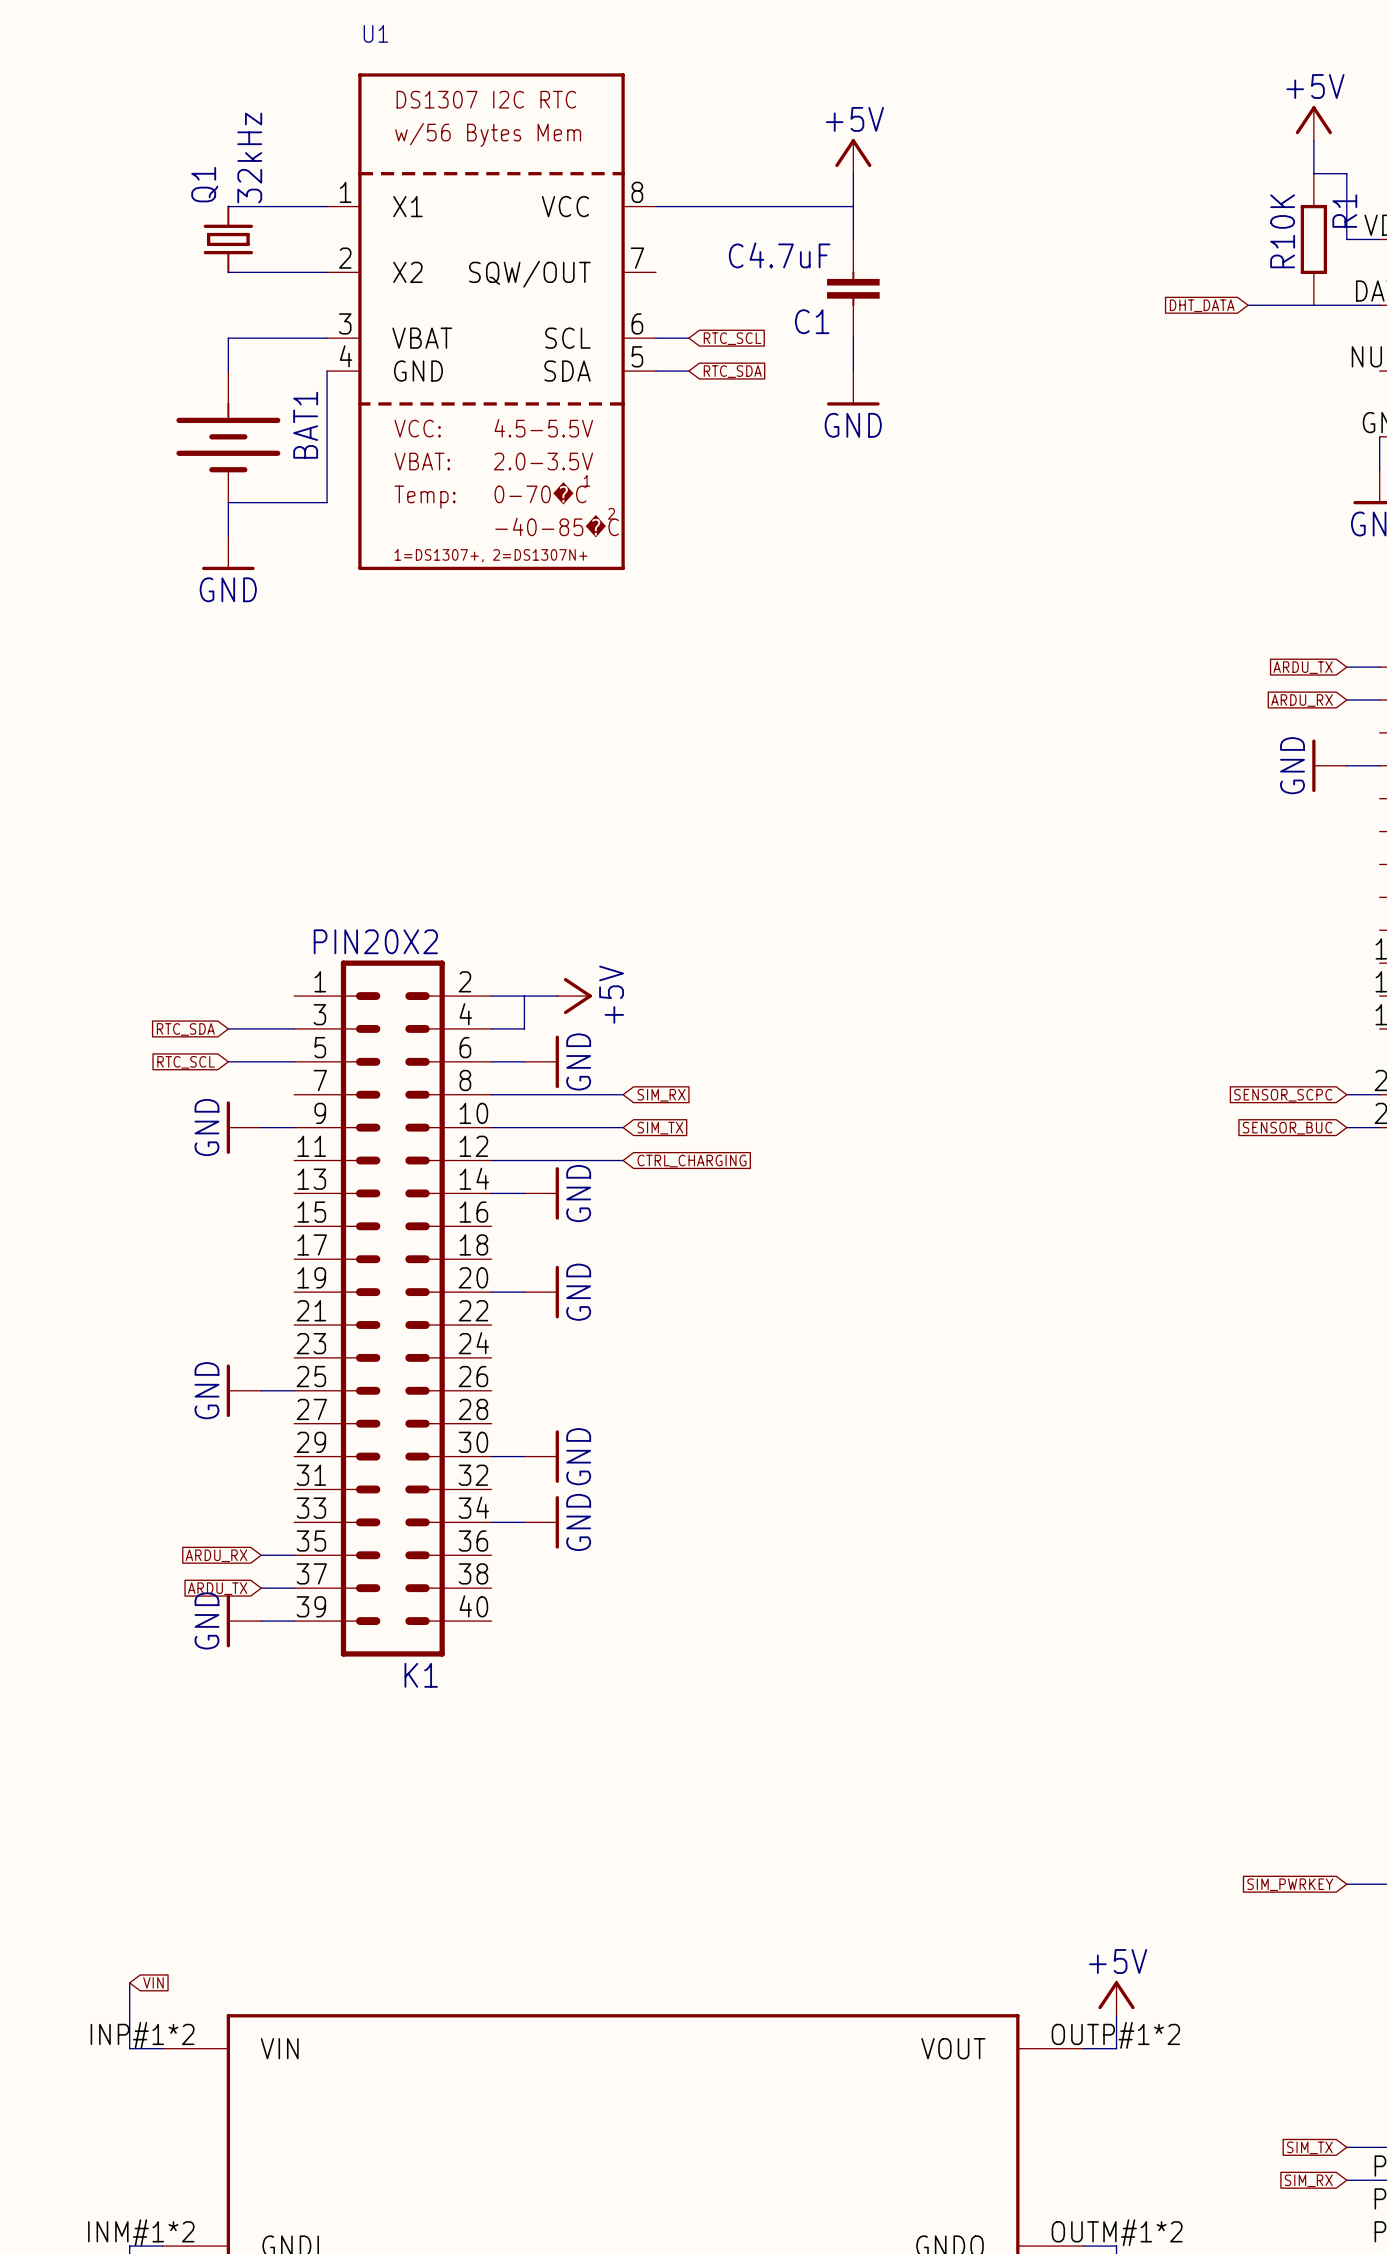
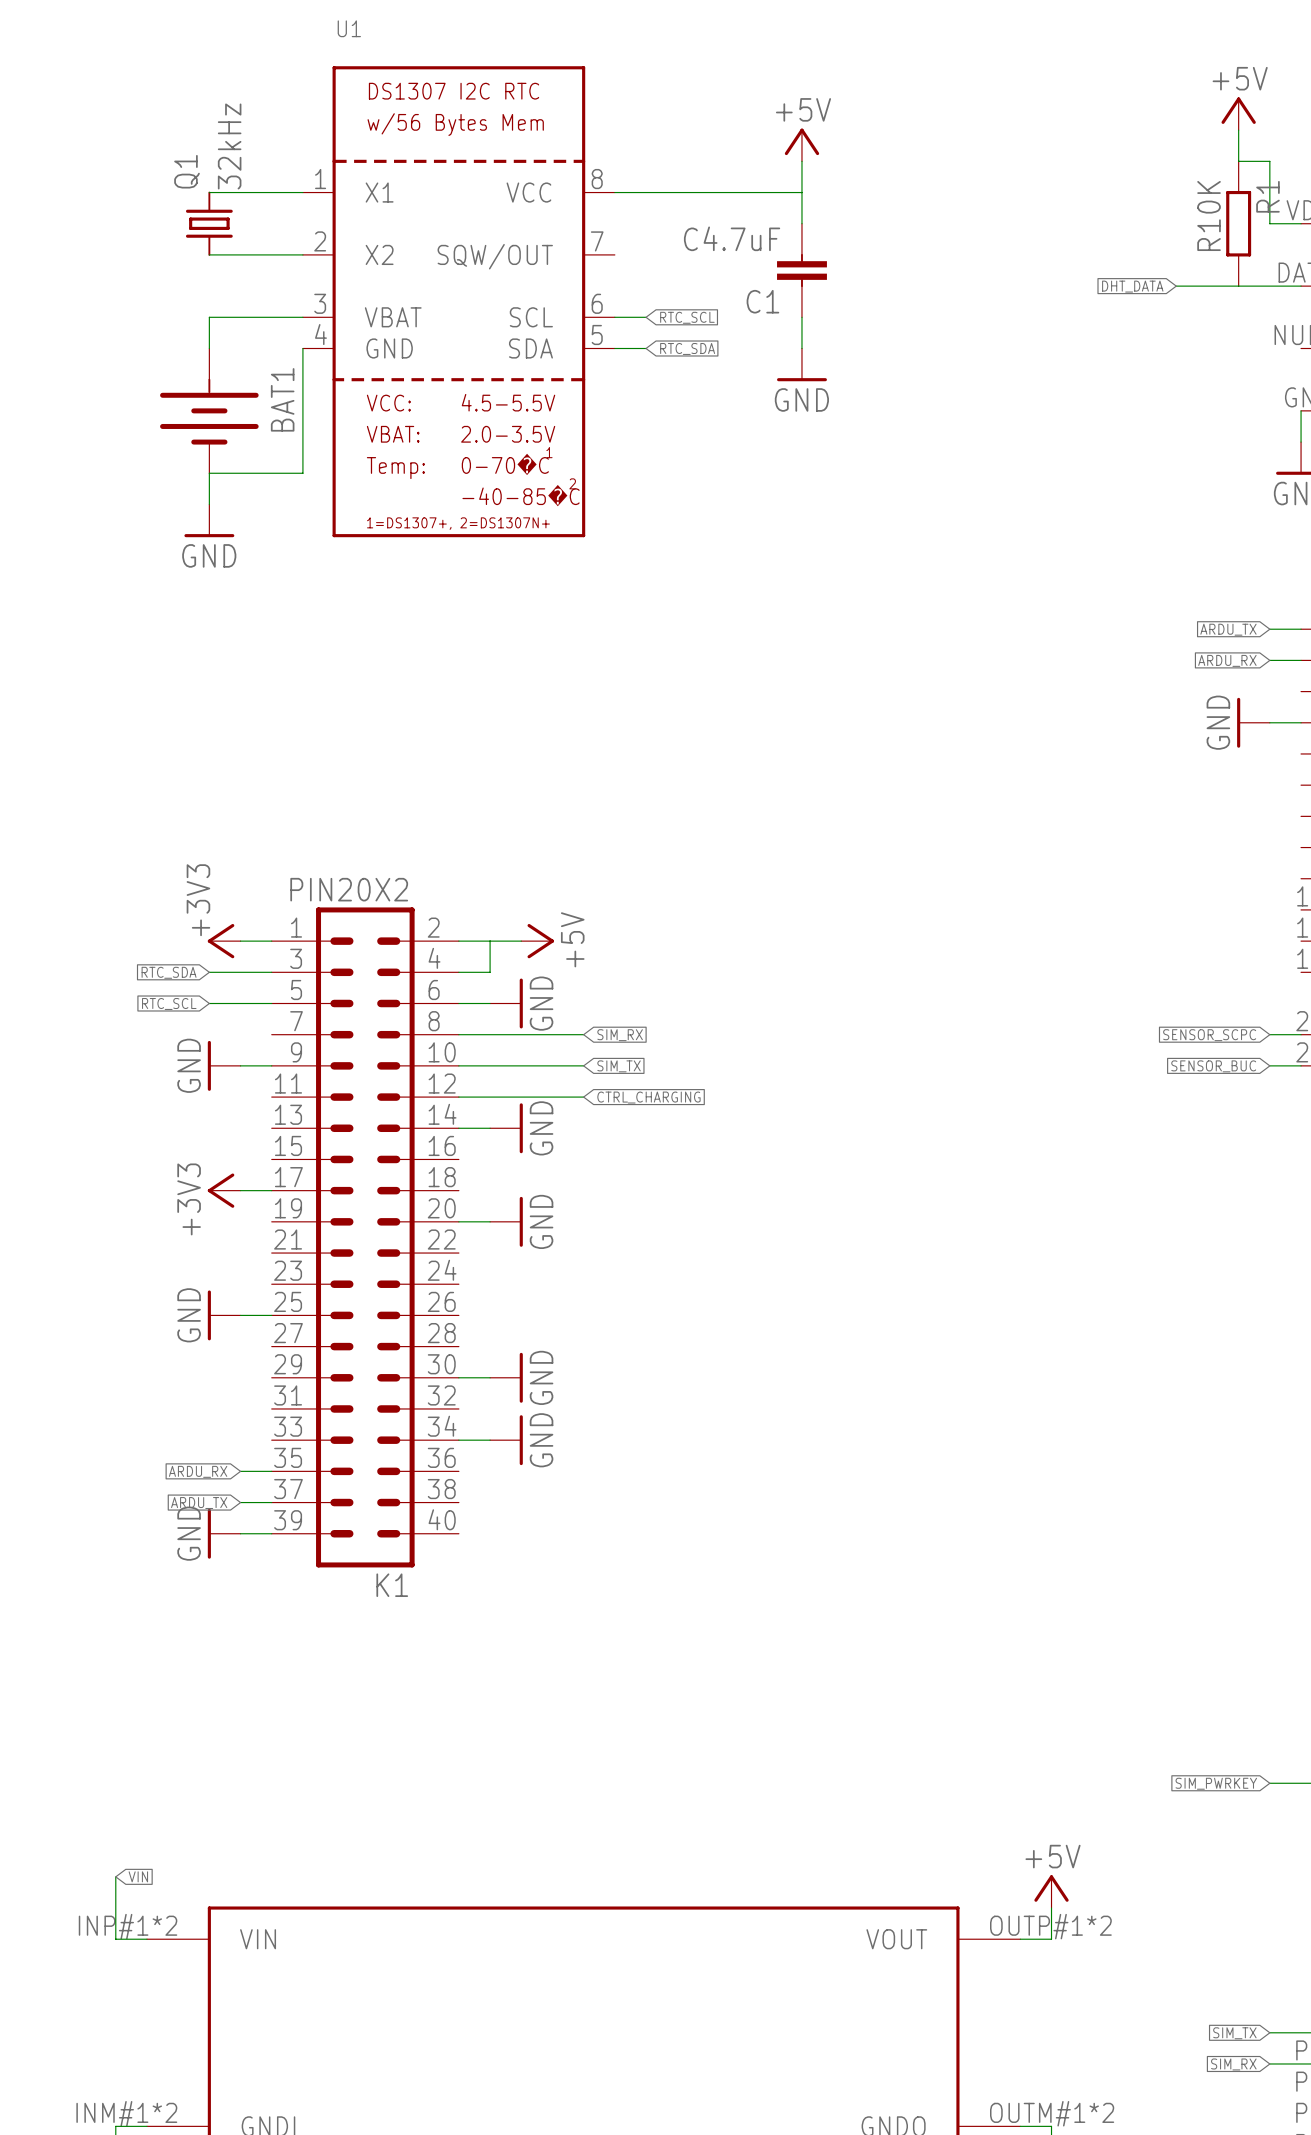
power symbol: none -> +3V3 (224, 941)
wire: none -> (240, 941) (271, 941)
power symbol: none -> +3V3 (224, 1190)
wire: none -> (240, 1190) (271, 1190)

